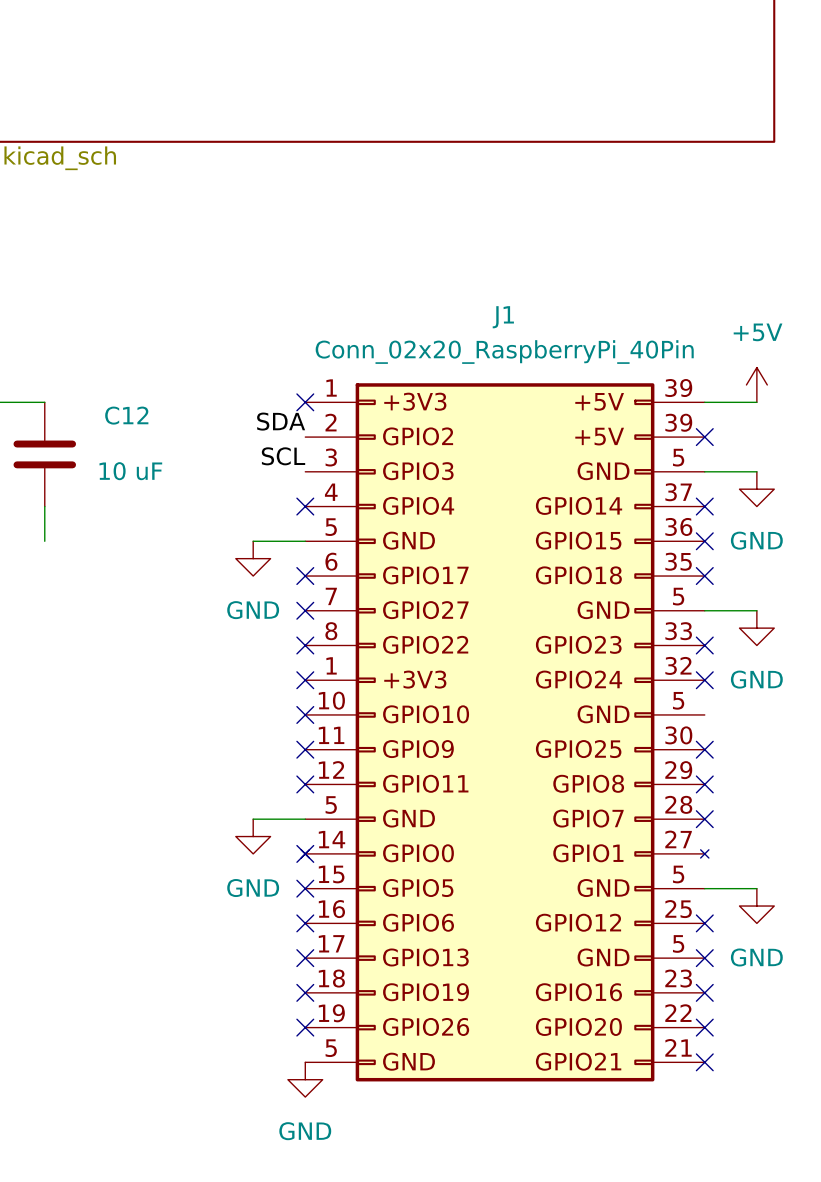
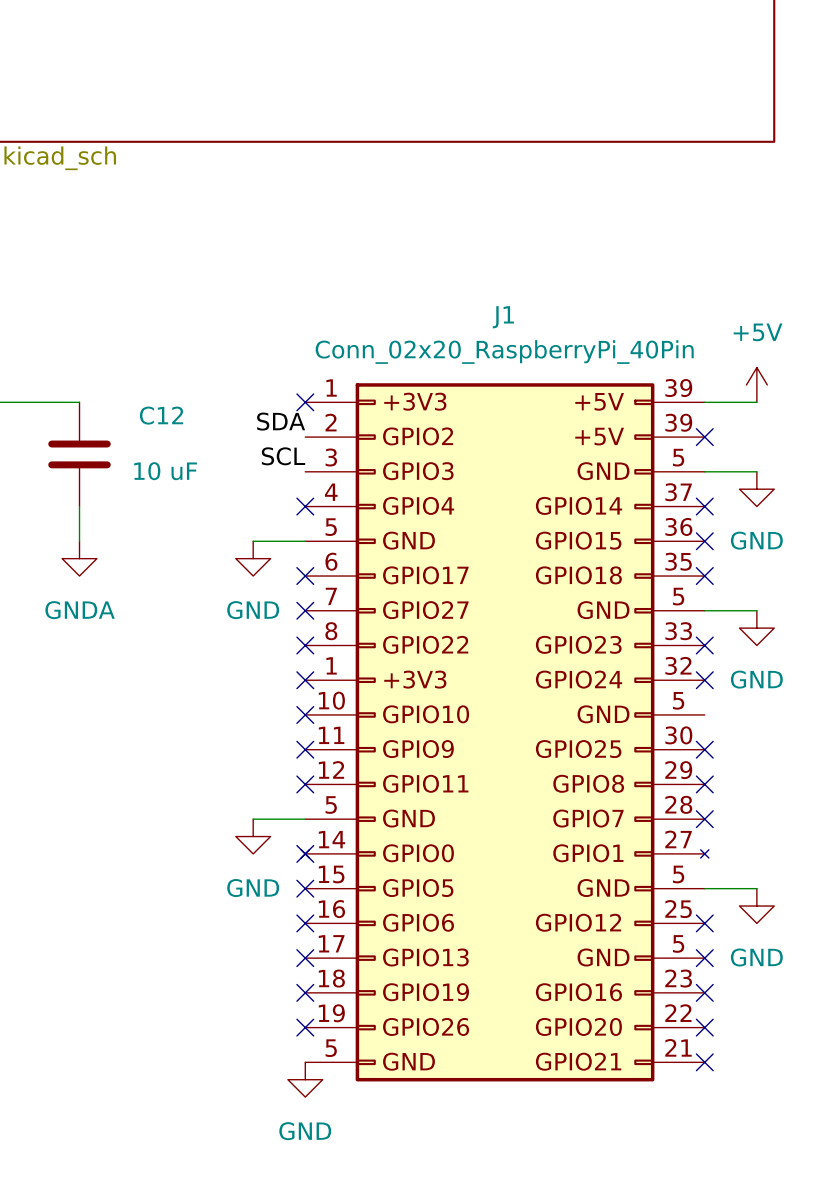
wire: none -> (44, 402) (79, 402)
C12 position: (44, 454) -> (79, 454)
wire: (44, 506) (44, 541) -> (79, 506) (79, 541)
power symbol: none -> GNDA (79, 558)

